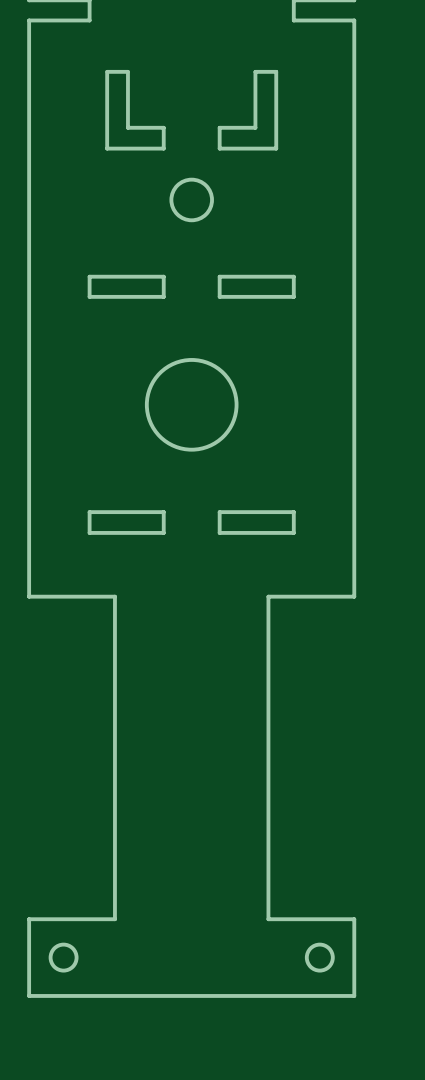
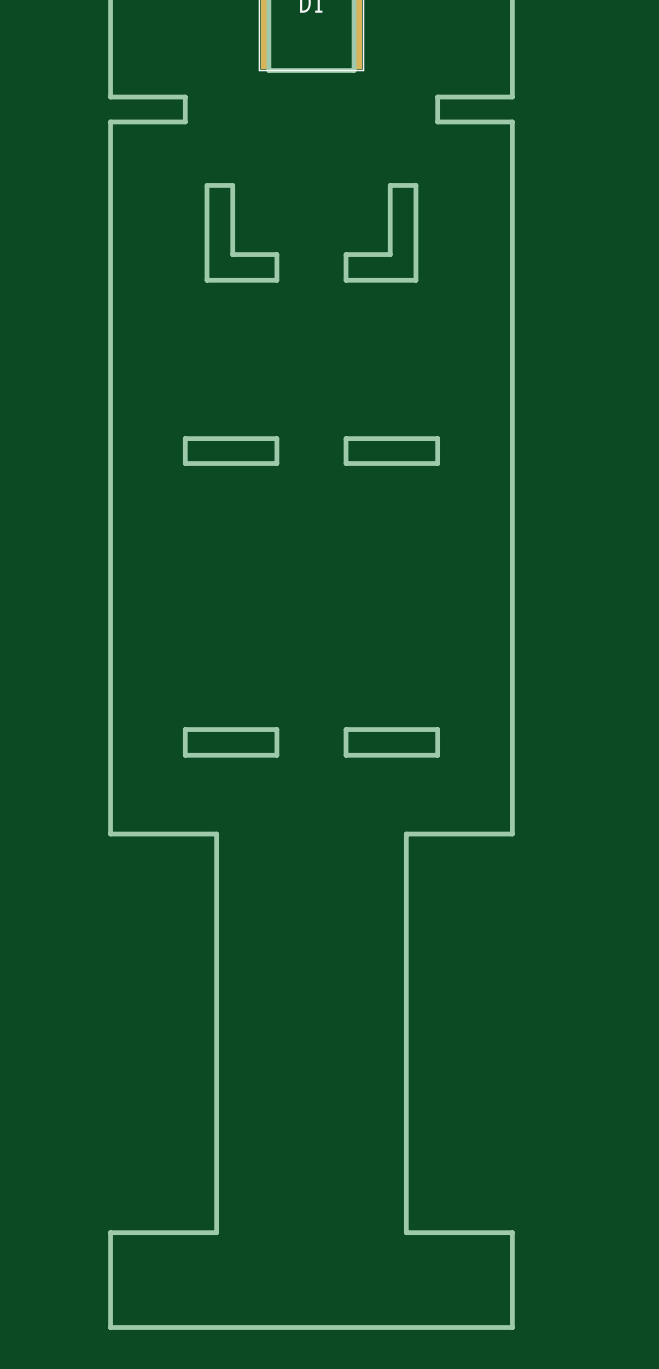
drawing: [169, 177, 214, 223] -> none
drawing: [144, 358, 239, 452] -> none
drawing: [48, 942, 79, 973] -> none
drawing: [304, 942, 335, 973] -> none

